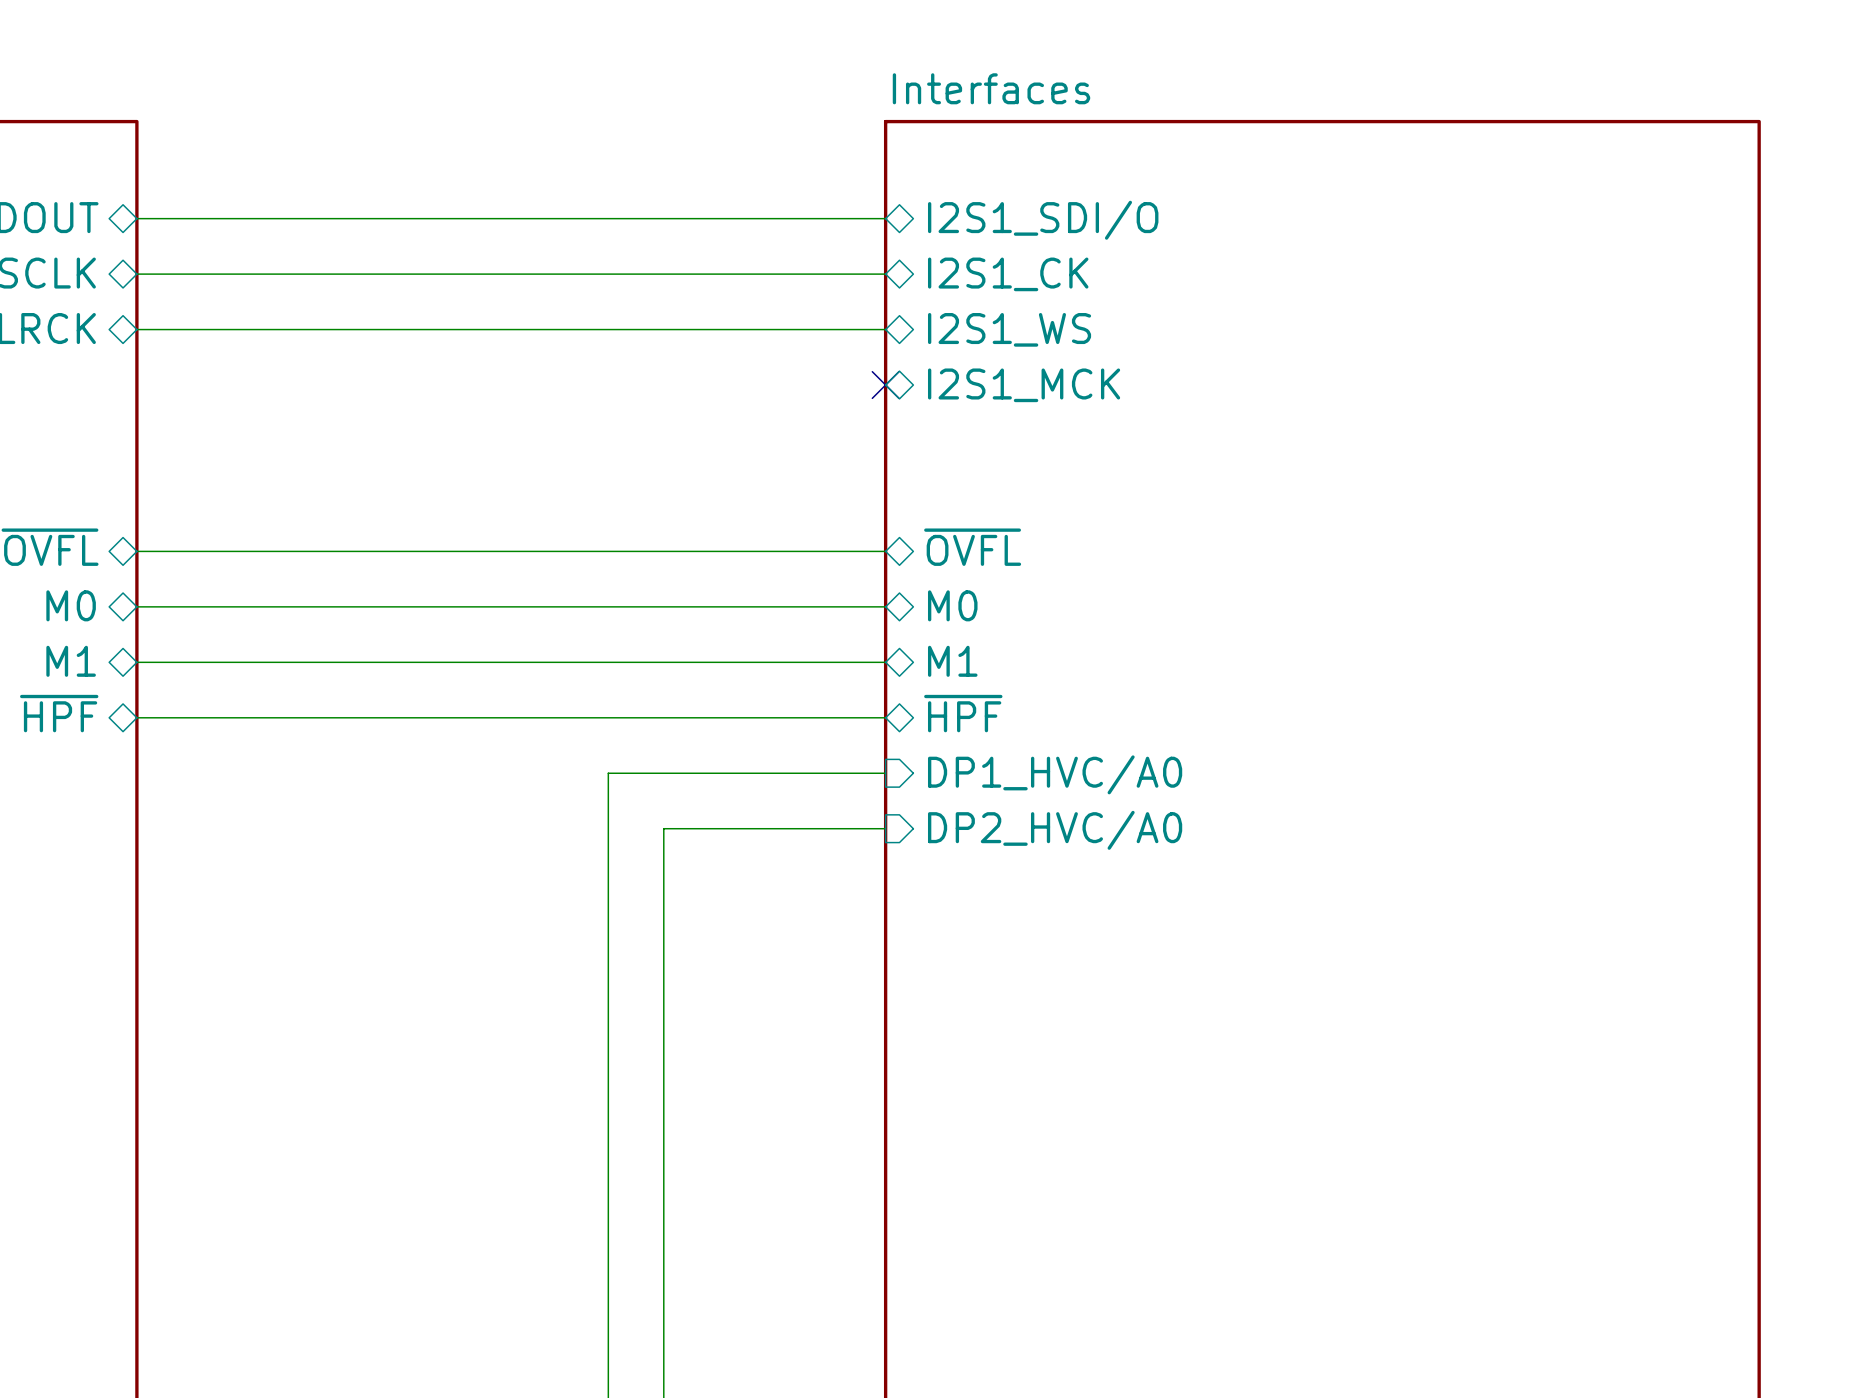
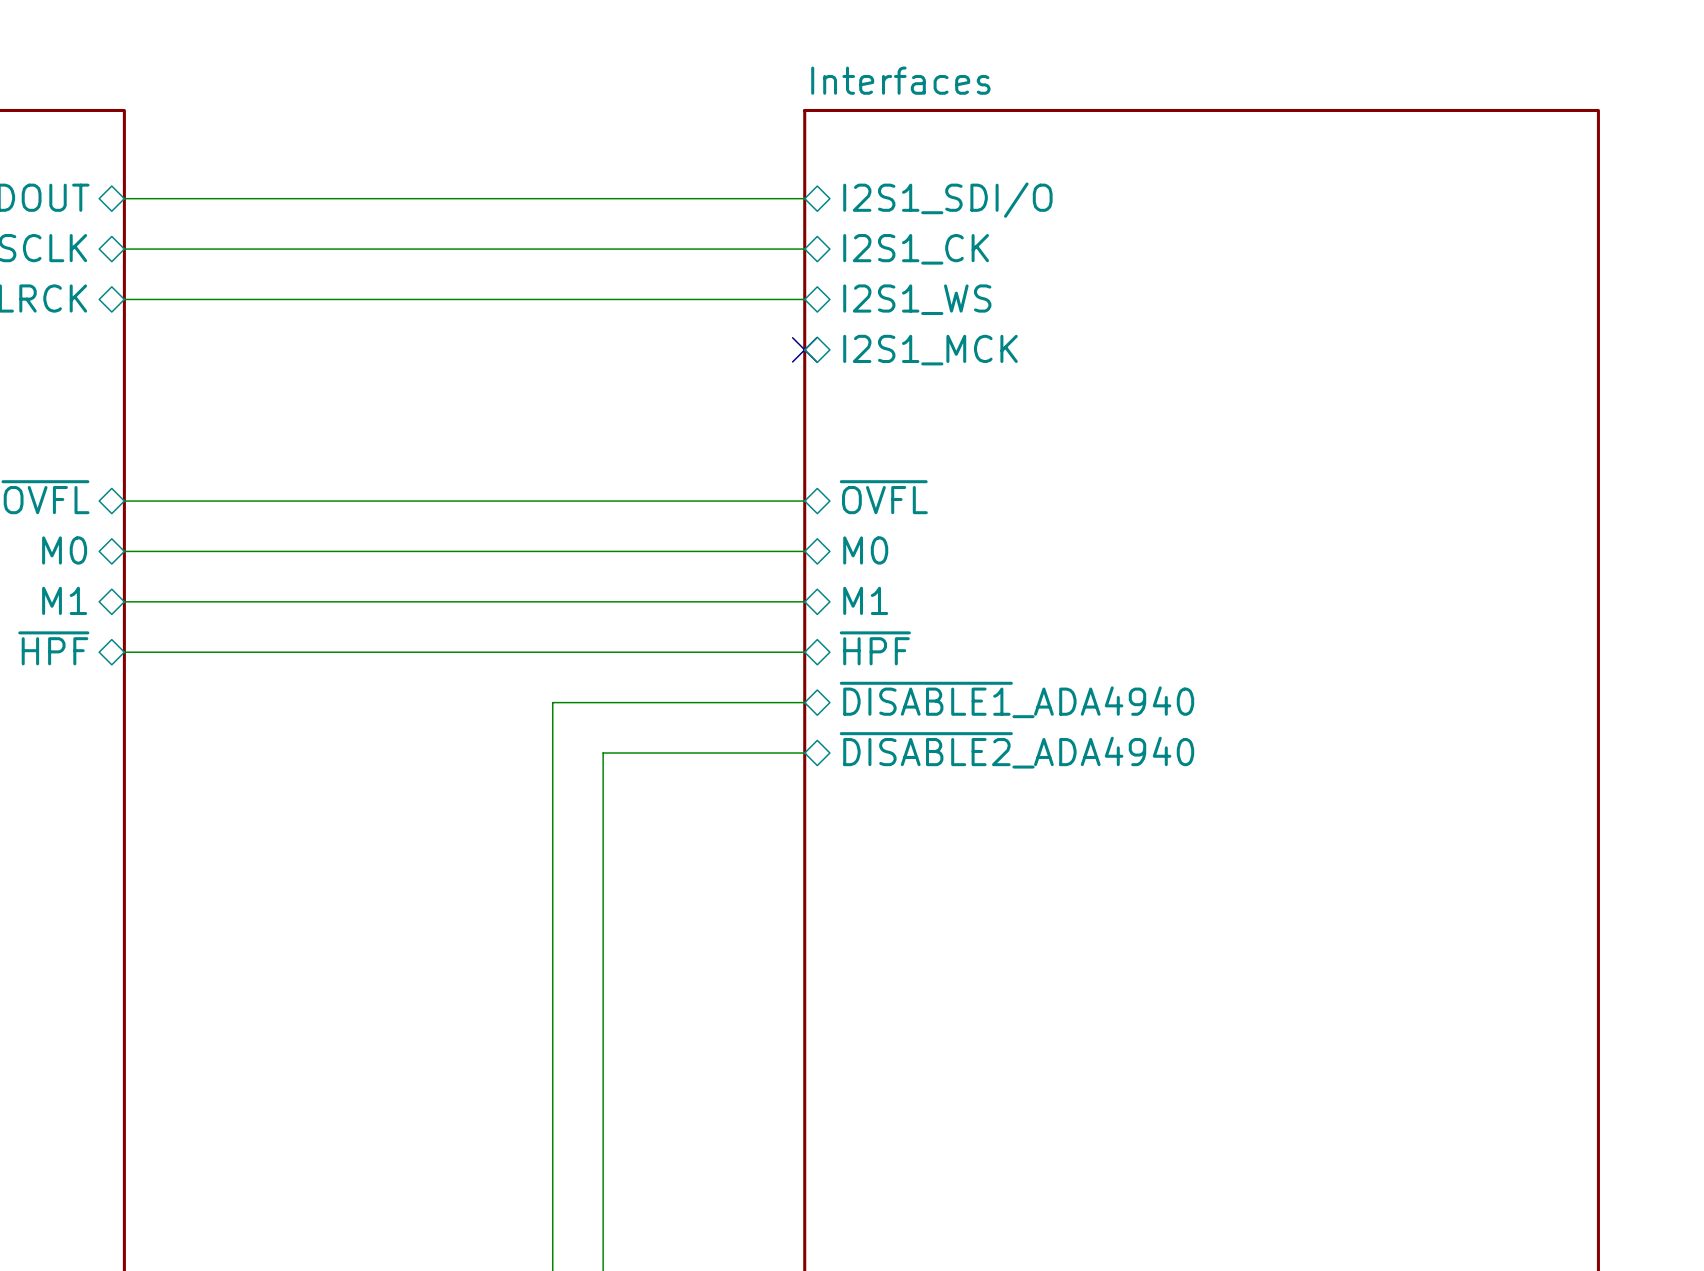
sheet pin shape: input (1055, 774) -> bidirectional (1016, 699)
sheet pin: DP1_HVC/A0 (1055, 774) -> ~{DISABLE1}_ADA4940 (1016, 699)
sheet pin shape: input (1055, 830) -> bidirectional (1016, 750)
sheet pin: DP2_HVC/A0 (1055, 830) -> ~{DISABLE2}_ADA4940 (1016, 750)

